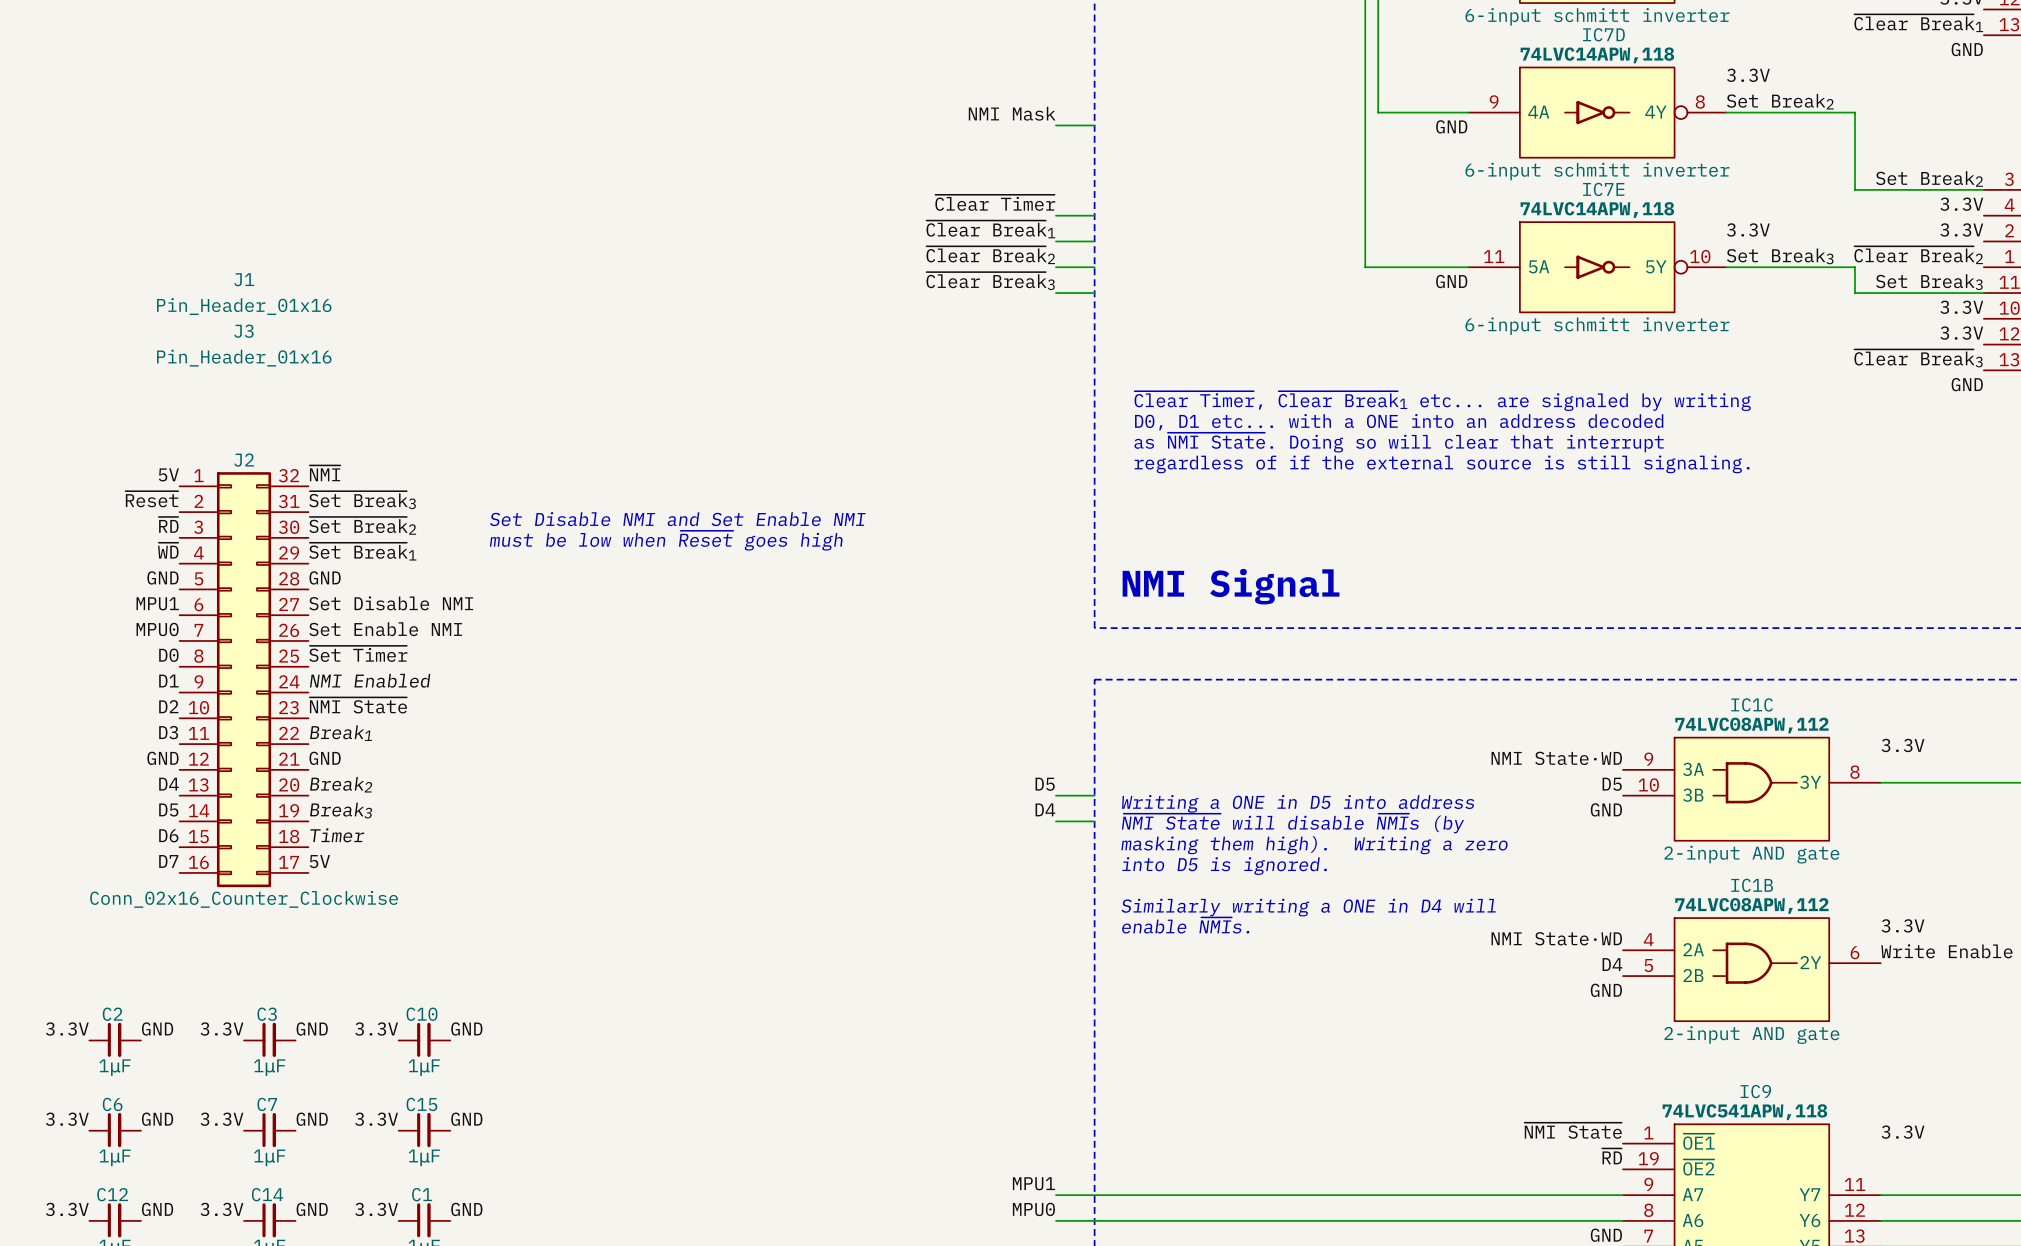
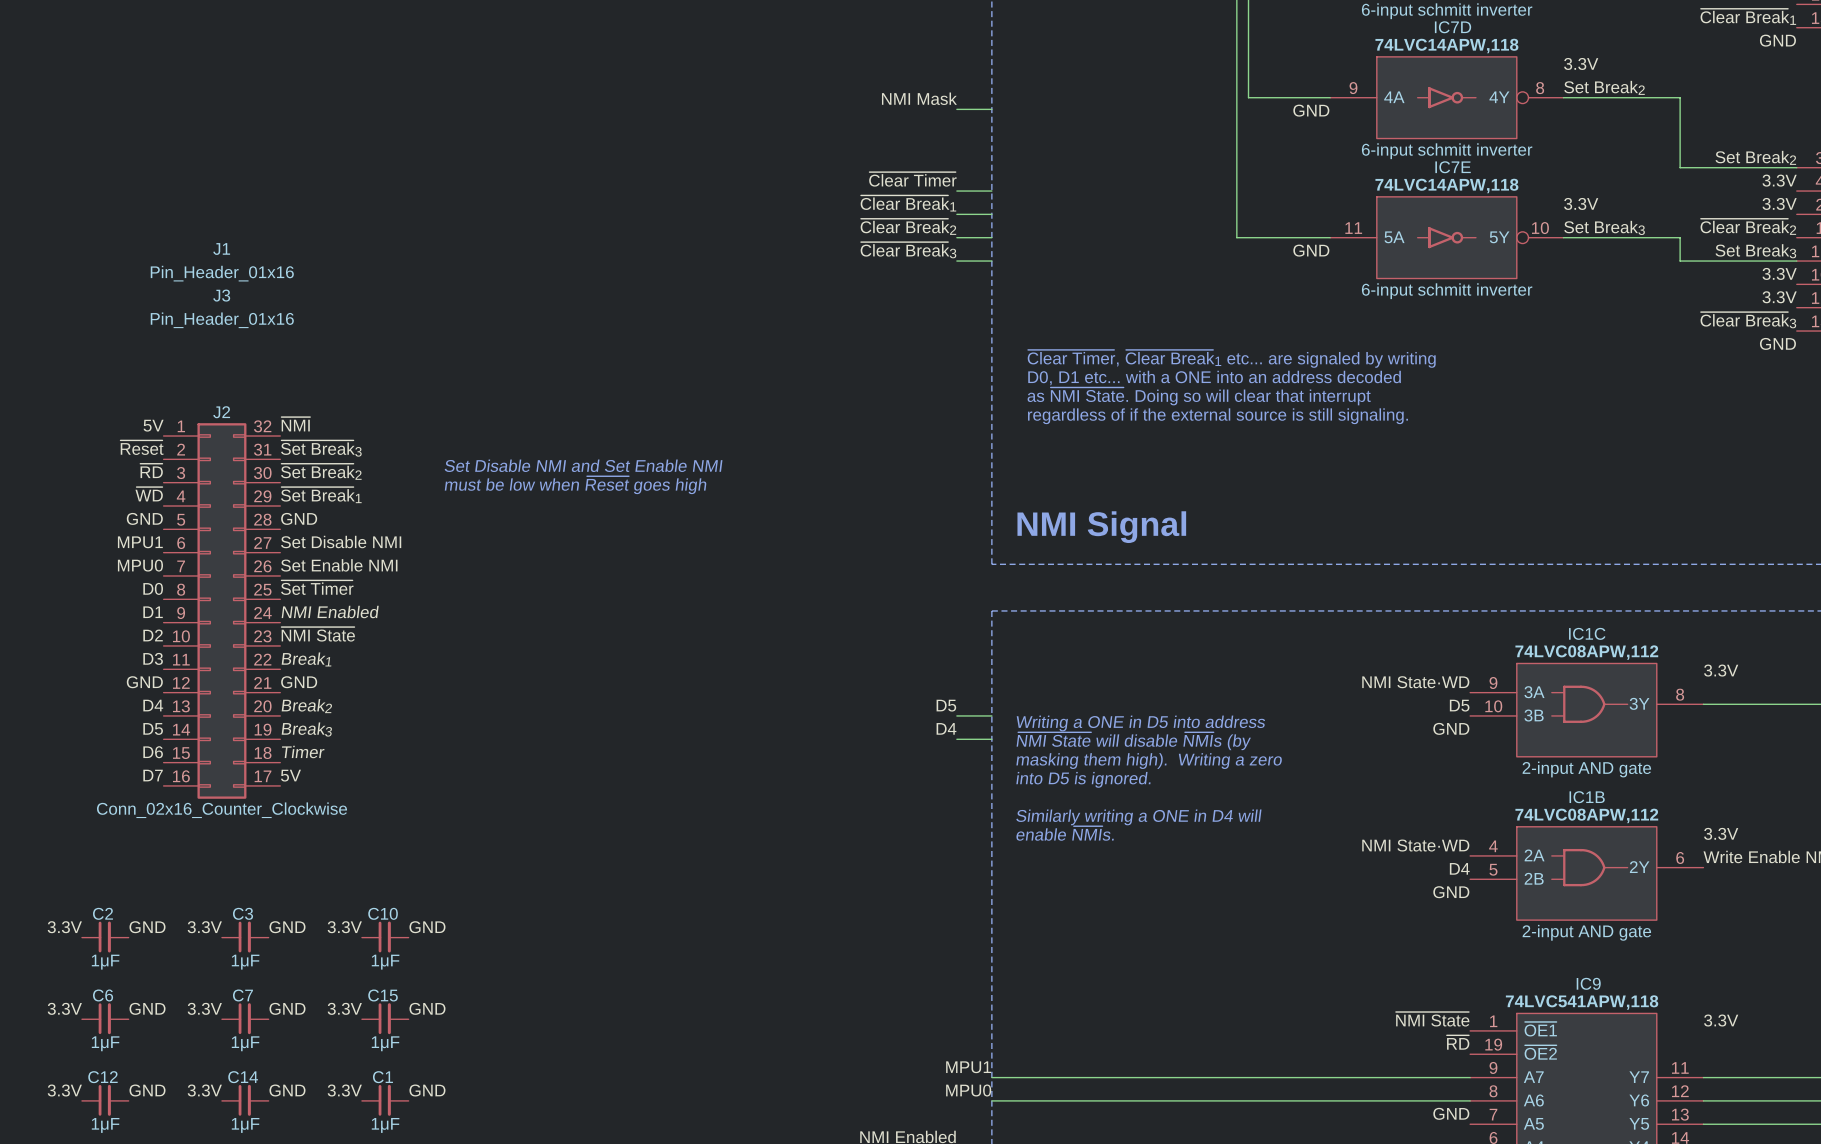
label position: MPU1 (1033, 1183) -> MPU1 (968, 1067)
wire: (1055, 1195) (1094, 1195) -> none
label position: MPU0 (1033, 1209) -> MPU0 (968, 1090)
wire: (1055, 1220) (1094, 1220) -> none

